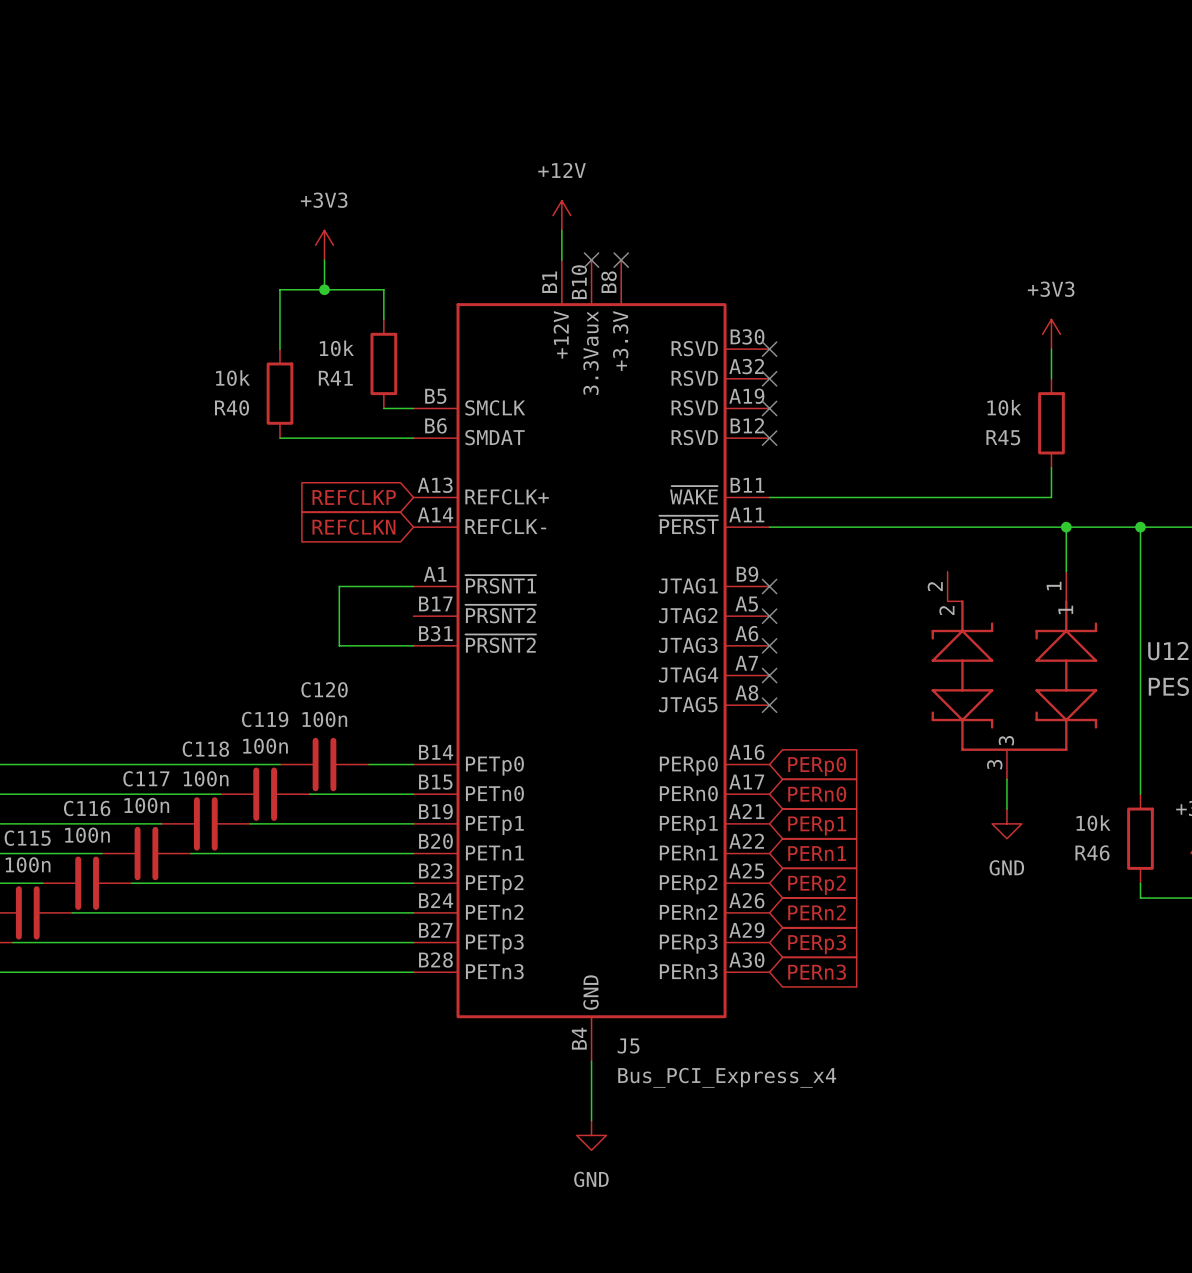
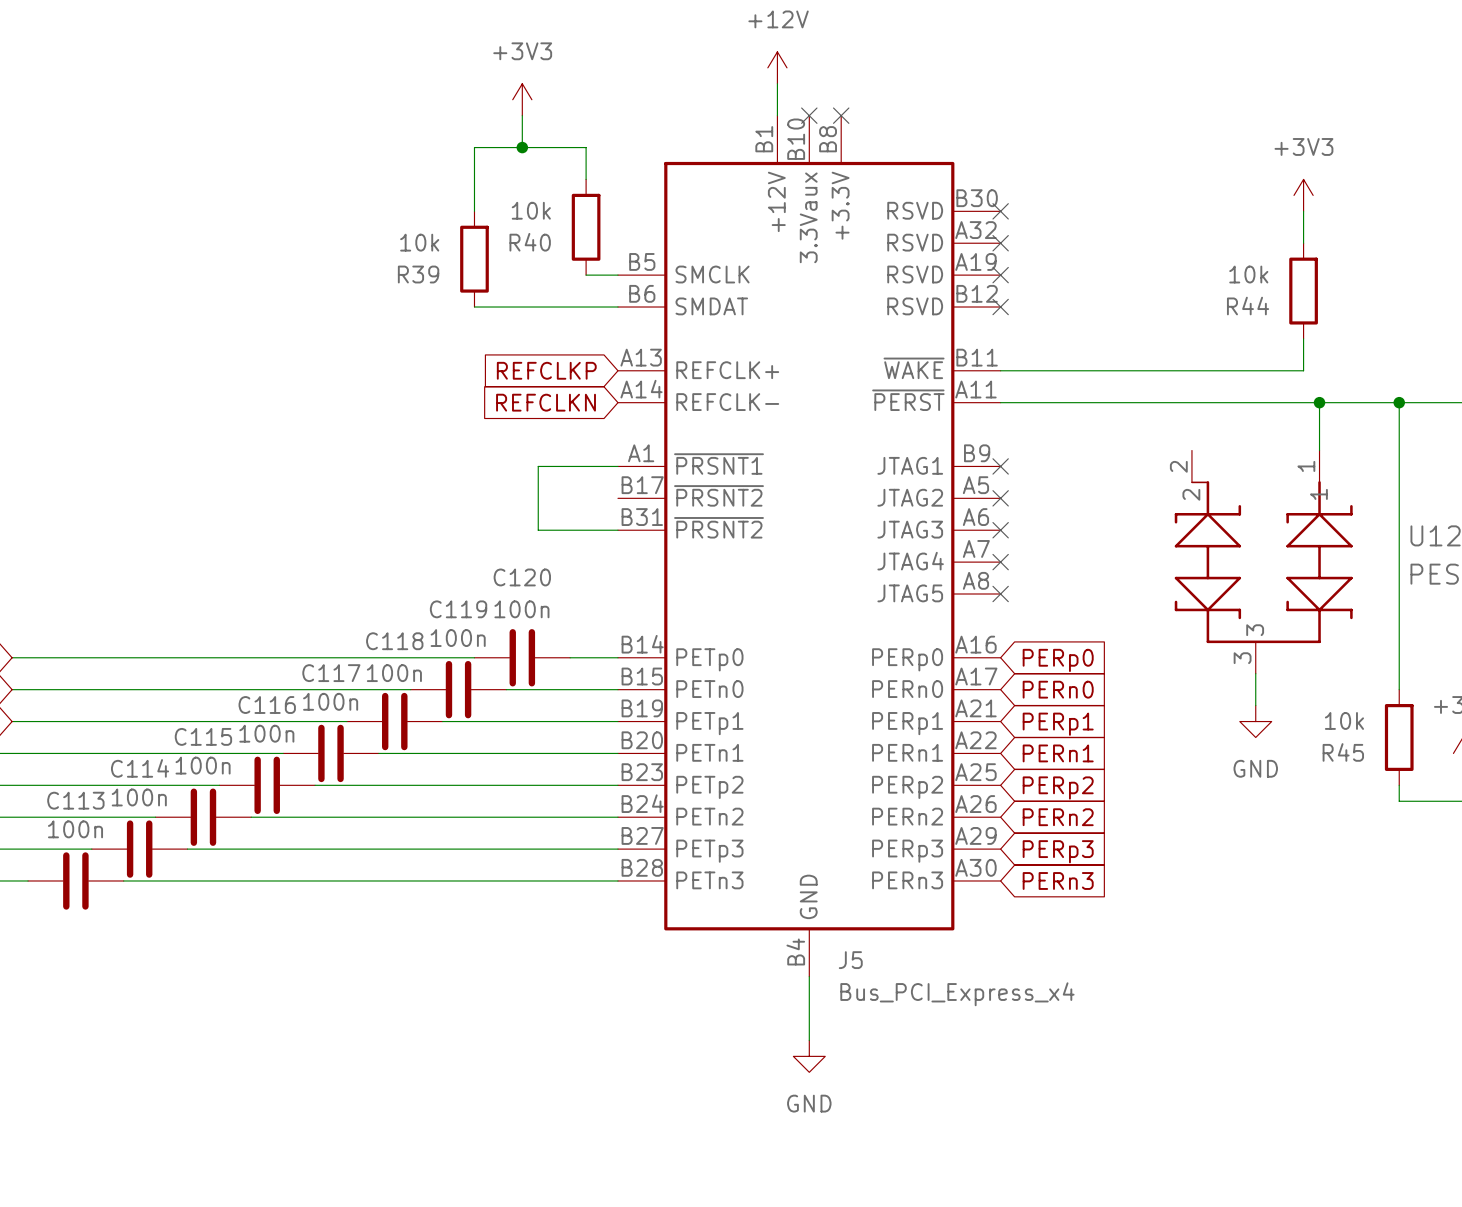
R41 name: R41 (335, 378) -> R40 (530, 242)
R40 name: R40 (231, 407) -> R39 (418, 274)
R45 name: R45 (1003, 437) -> R44 (1248, 306)
R46 name: R46 (1092, 853) -> R45 (1343, 752)

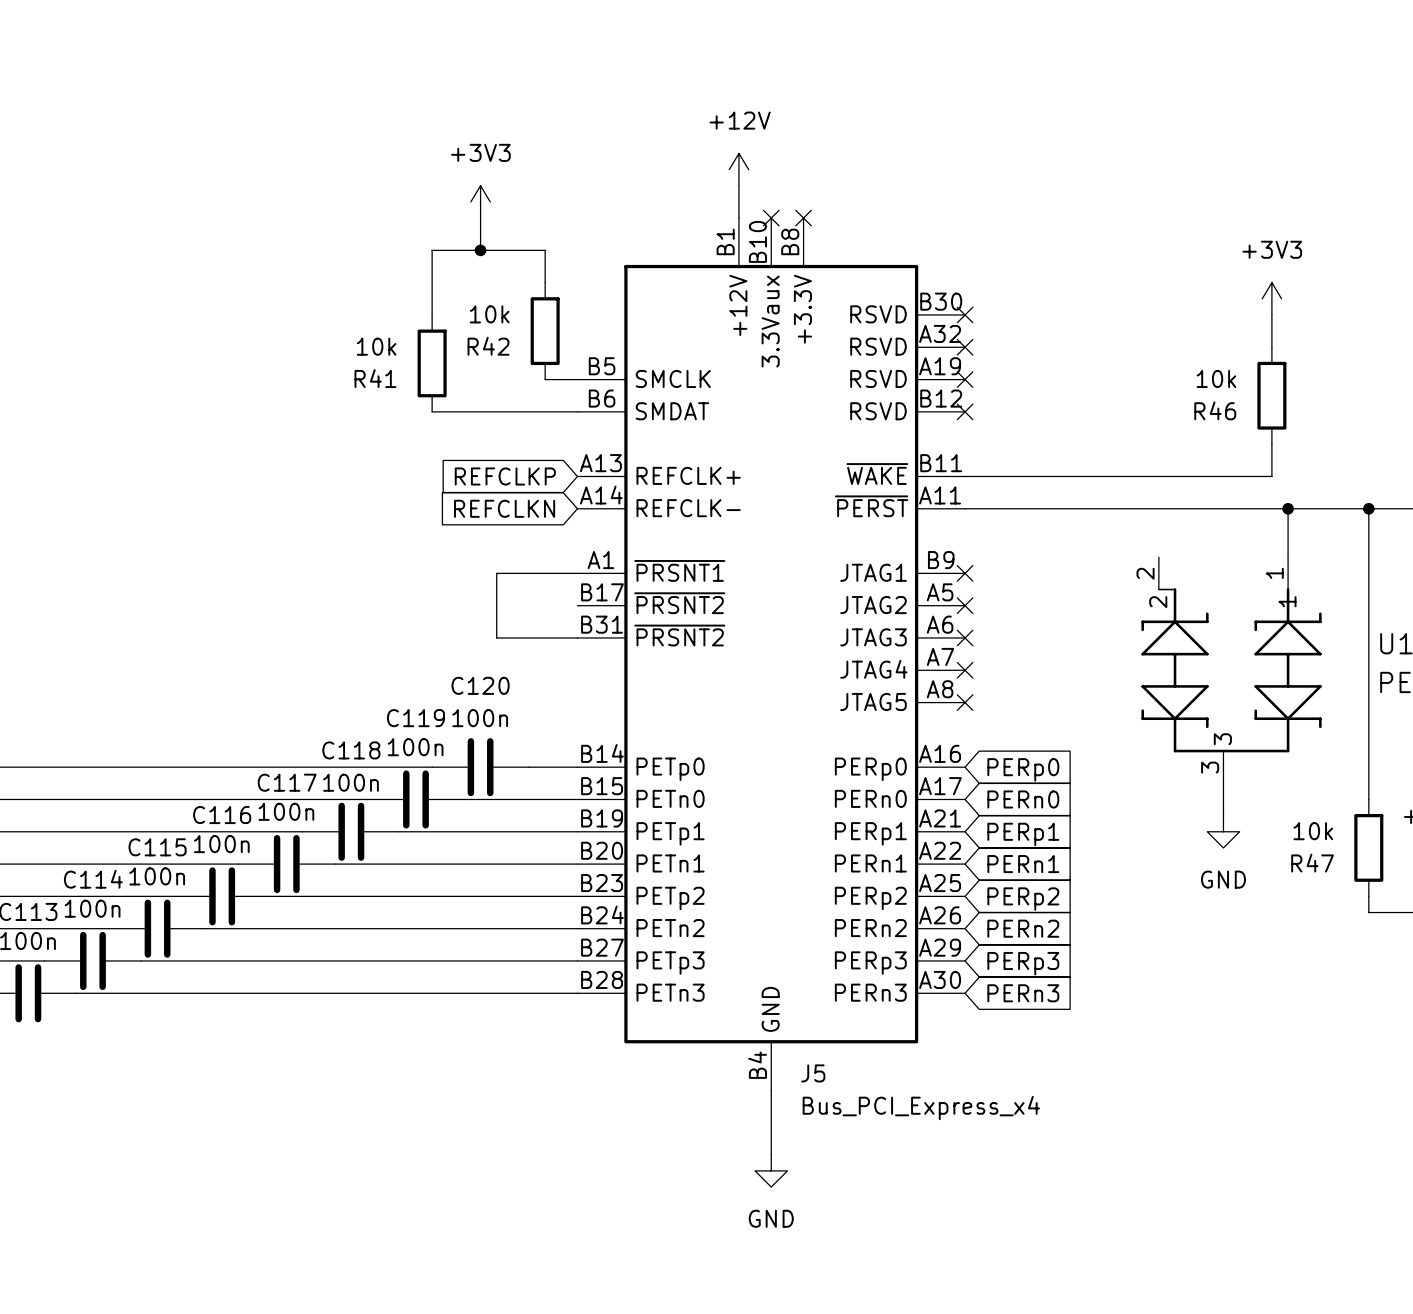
R40 name: R40 (530, 242) -> R42 (488, 346)
R39 name: R39 (418, 274) -> R41 (375, 378)
R44 name: R44 (1248, 306) -> R46 (1215, 410)
R45 name: R45 (1343, 752) -> R47 (1312, 863)

